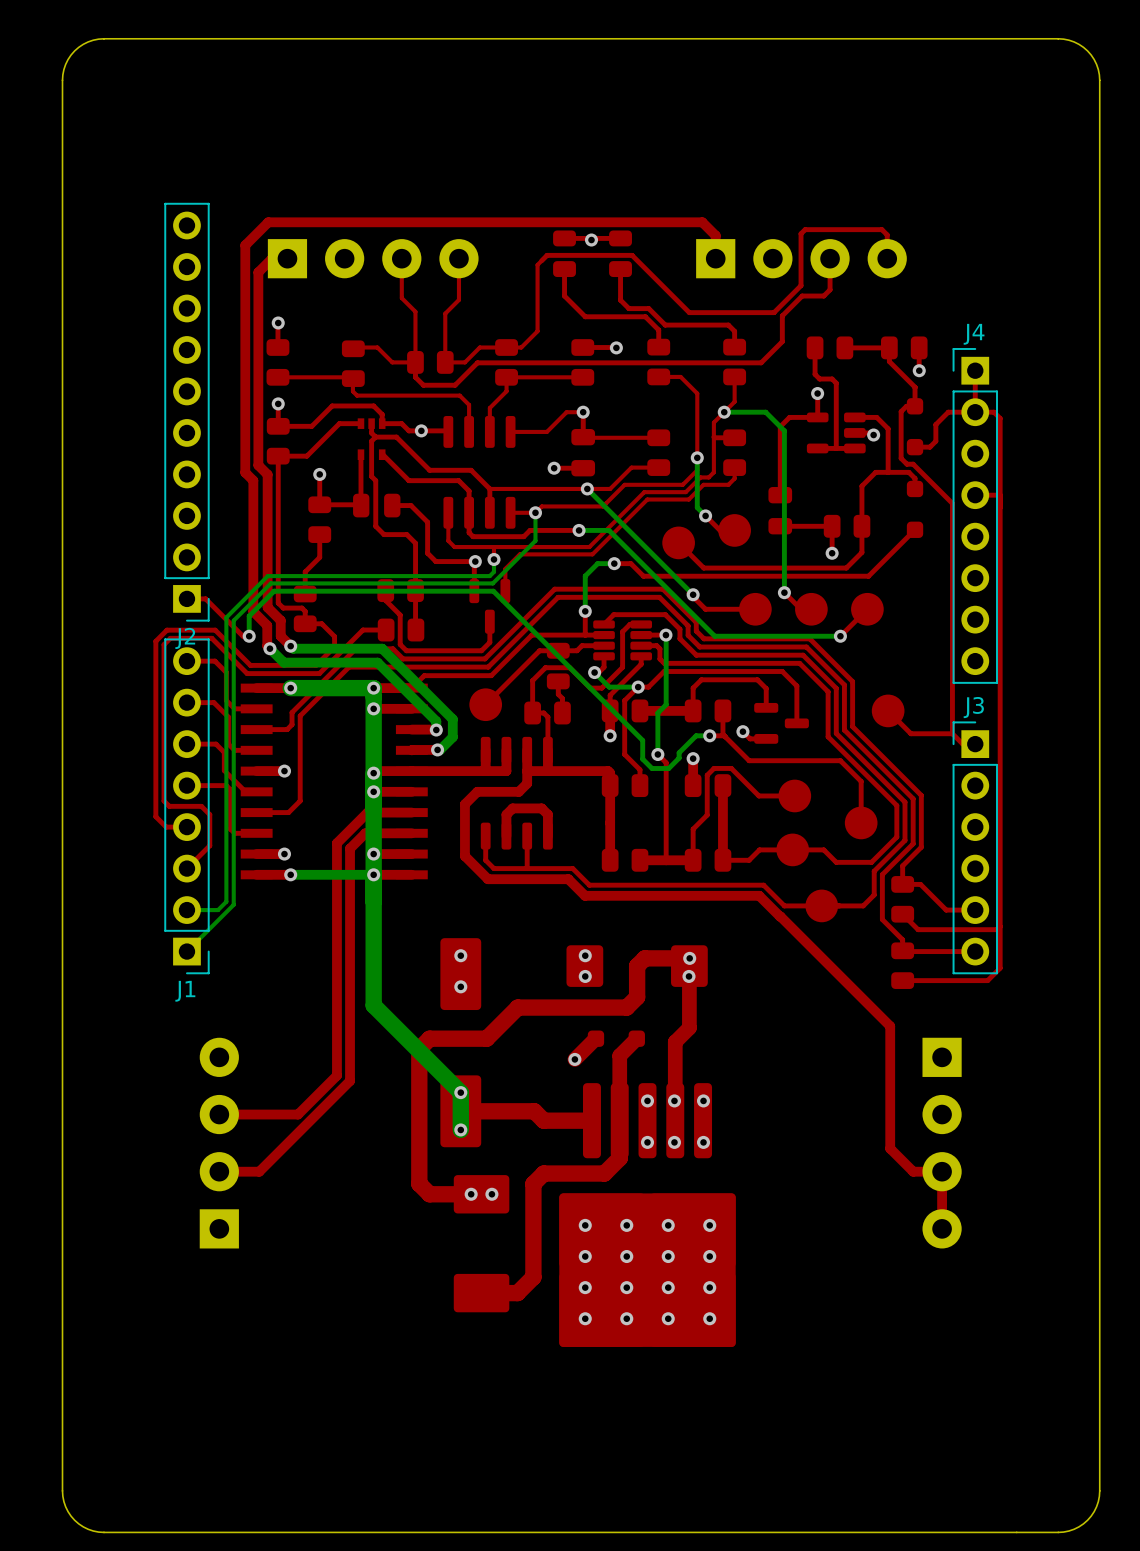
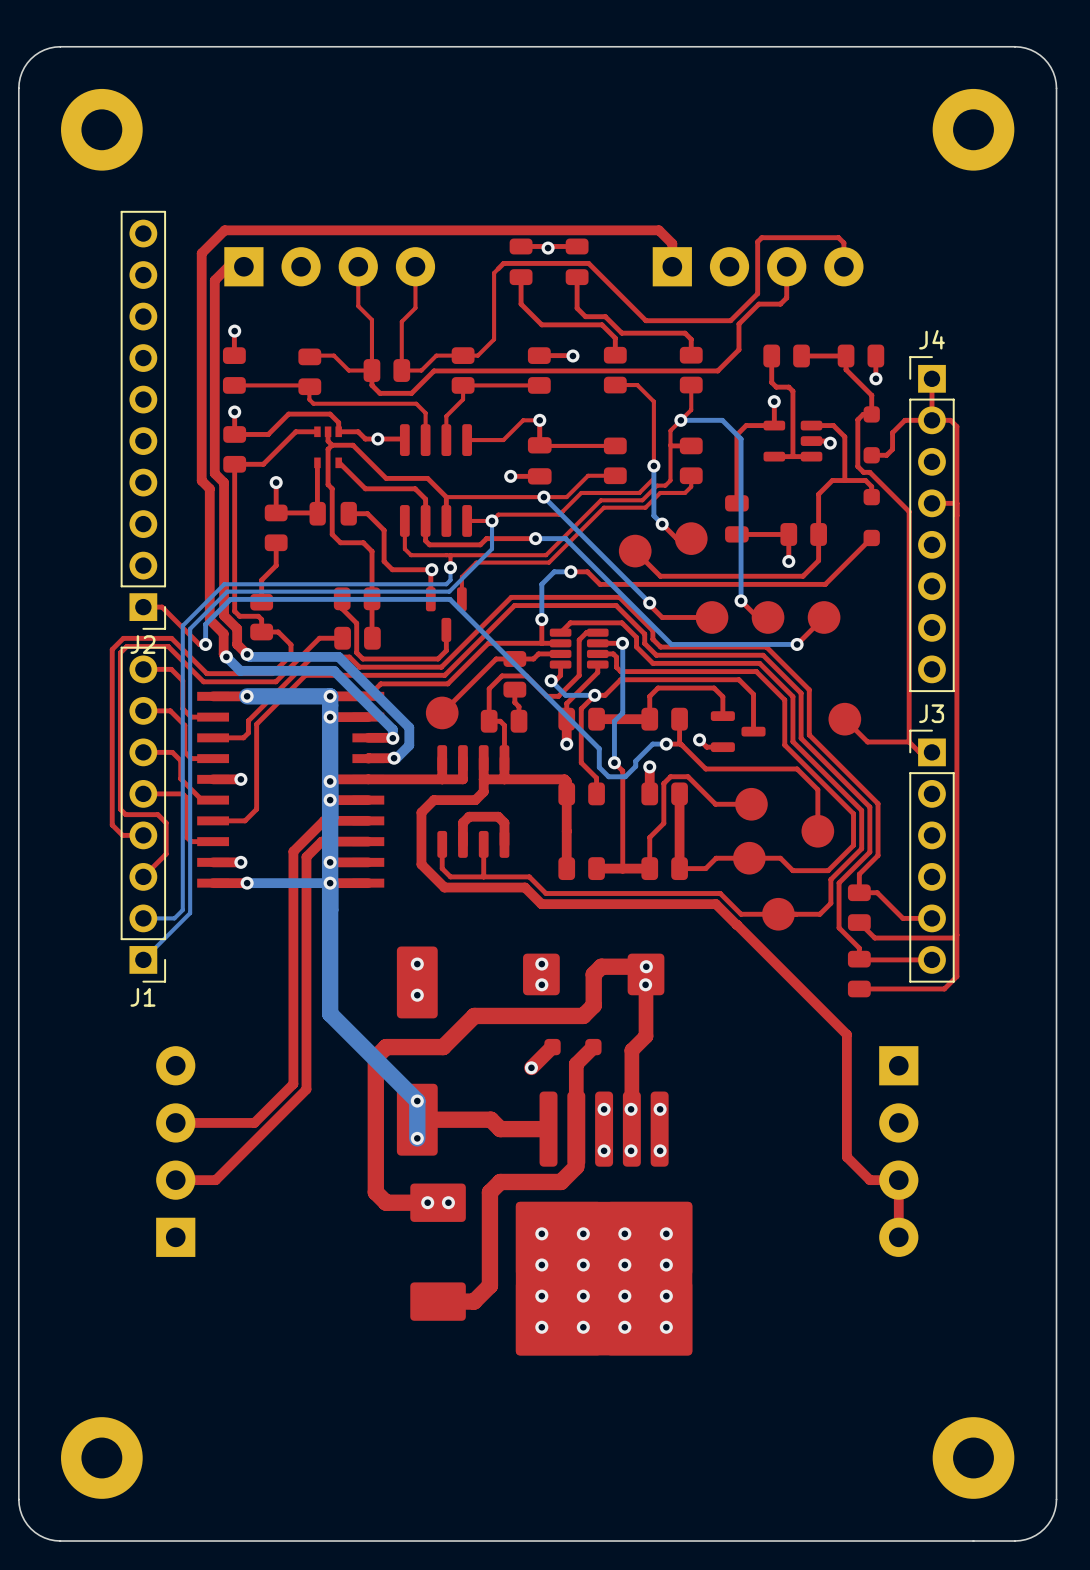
part: none -> (101, 129)
part: none -> (973, 129)
part: none -> (101, 1457)
part: none -> (973, 1457)

